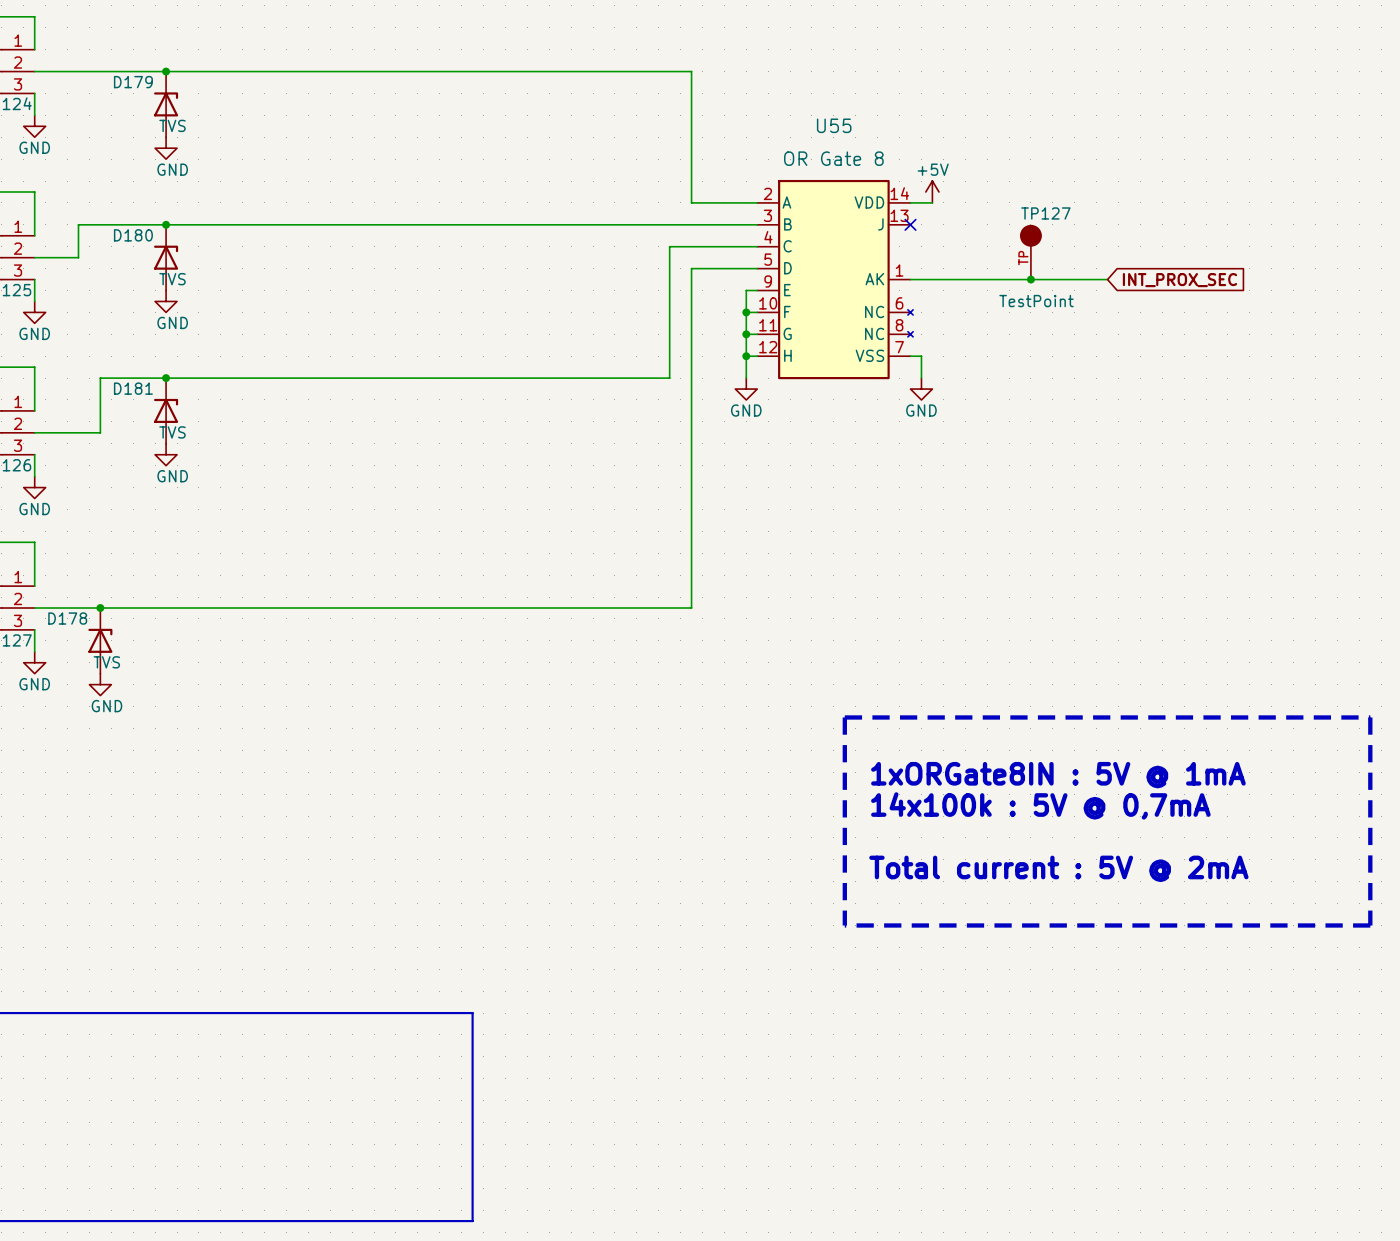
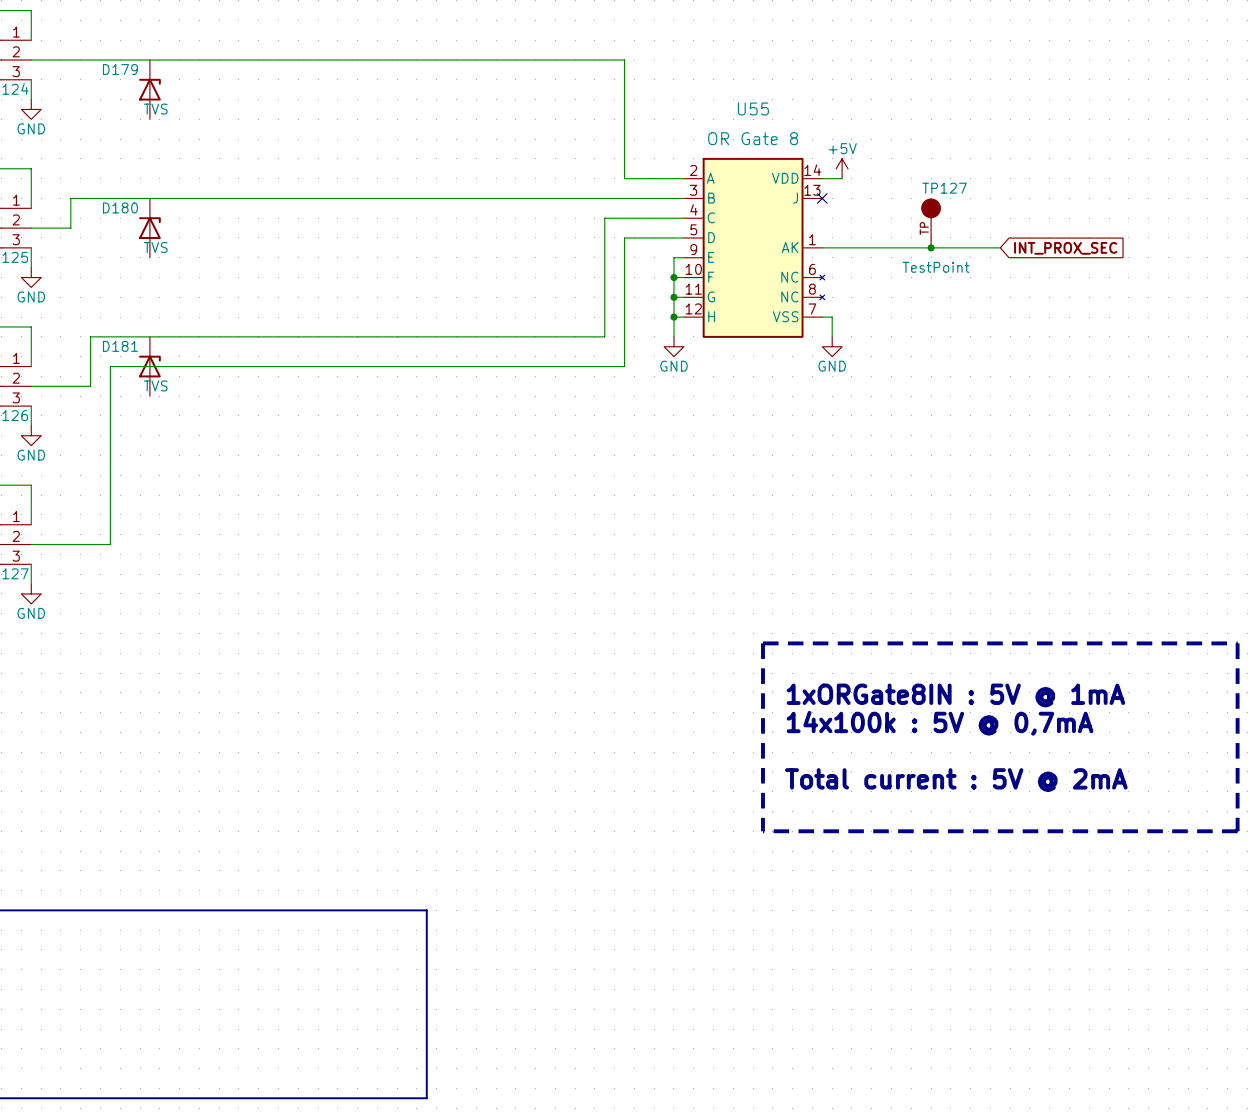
junction: (166, 71) -> none
power symbol: GND (166, 148) -> none
junction: (166, 224) -> none
power symbol: GND (166, 301) -> none
junction: (166, 378) -> none
wire: (691, 410) (691, 608) (122, 608) -> (624, 366) (110, 366) (110, 544)
power symbol: GND (166, 454) -> none
junction: (100, 608) -> none
D178: TVS (100, 640) -> none
power symbol: GND (100, 684) -> none

